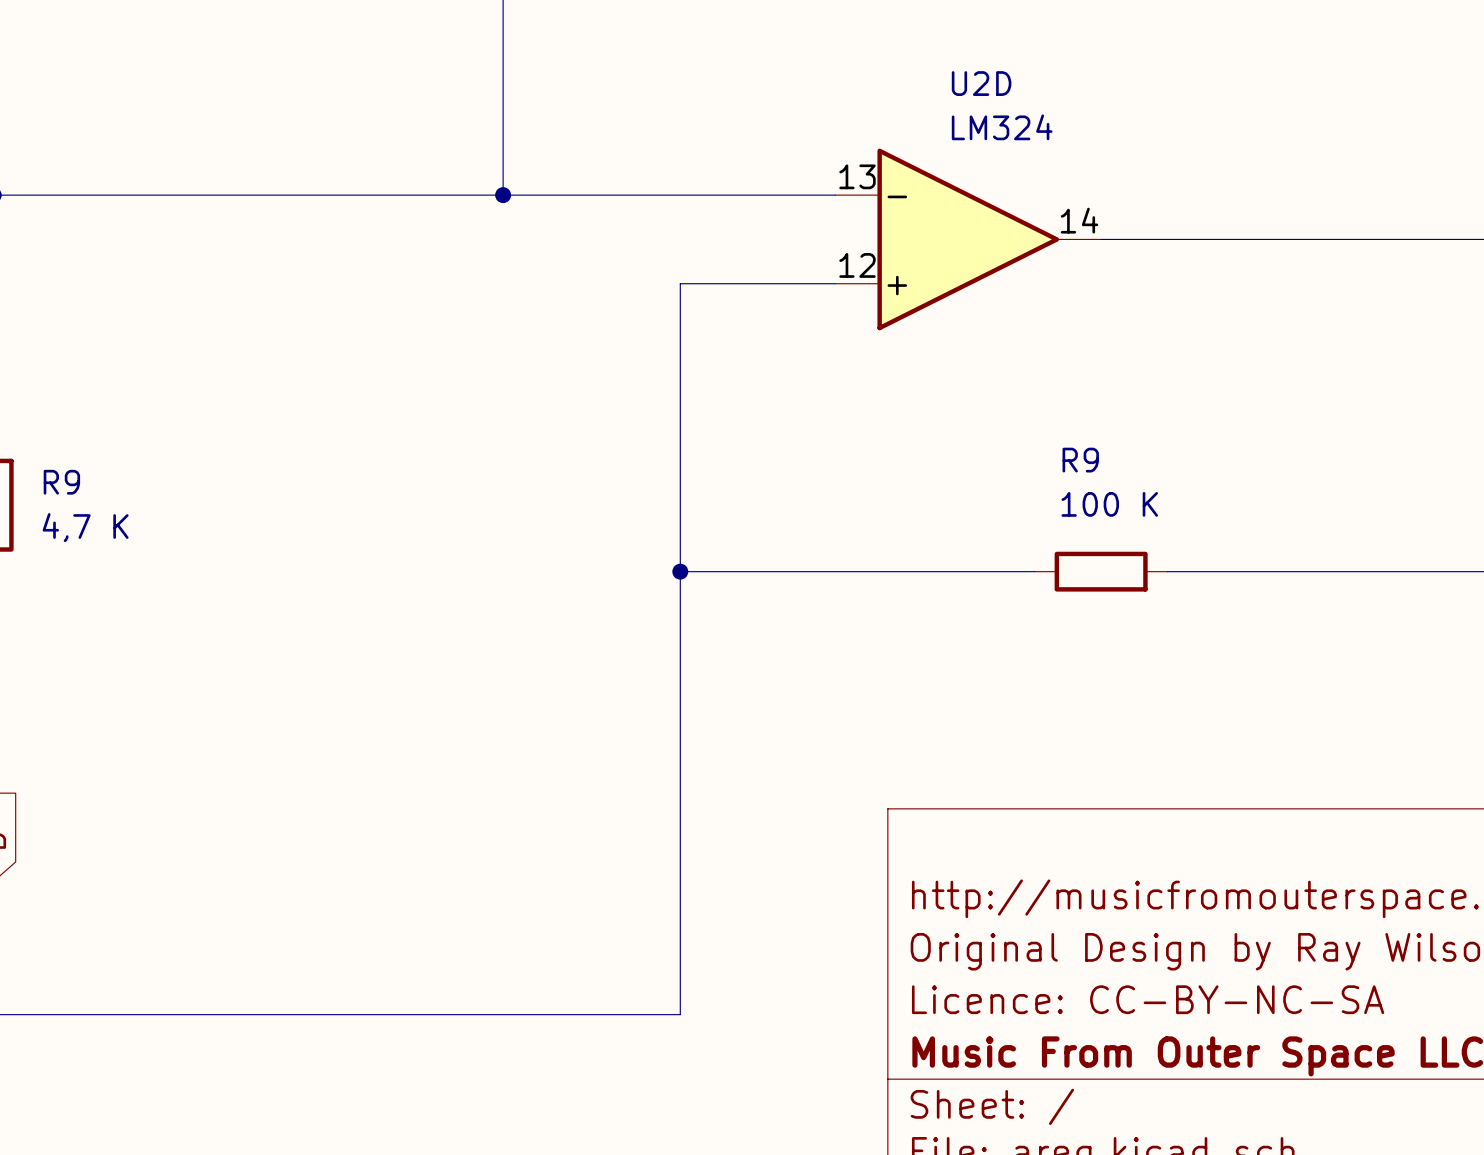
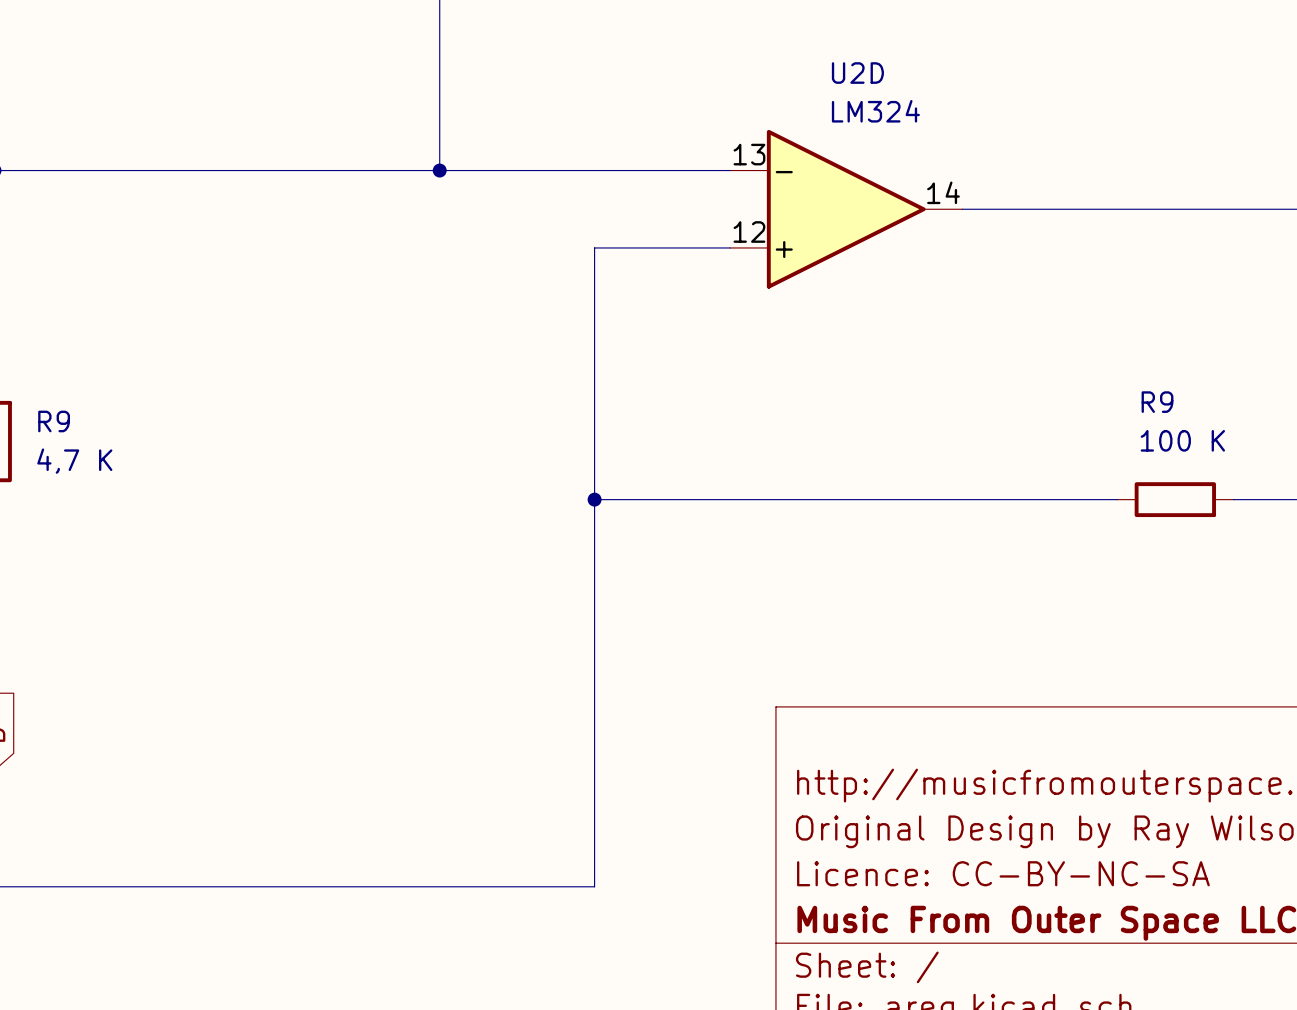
R9 position: (1101, 571) -> (1175, 499)
wire: (1278, 571) (1411, 571) -> (904, 499) (1020, 499)

